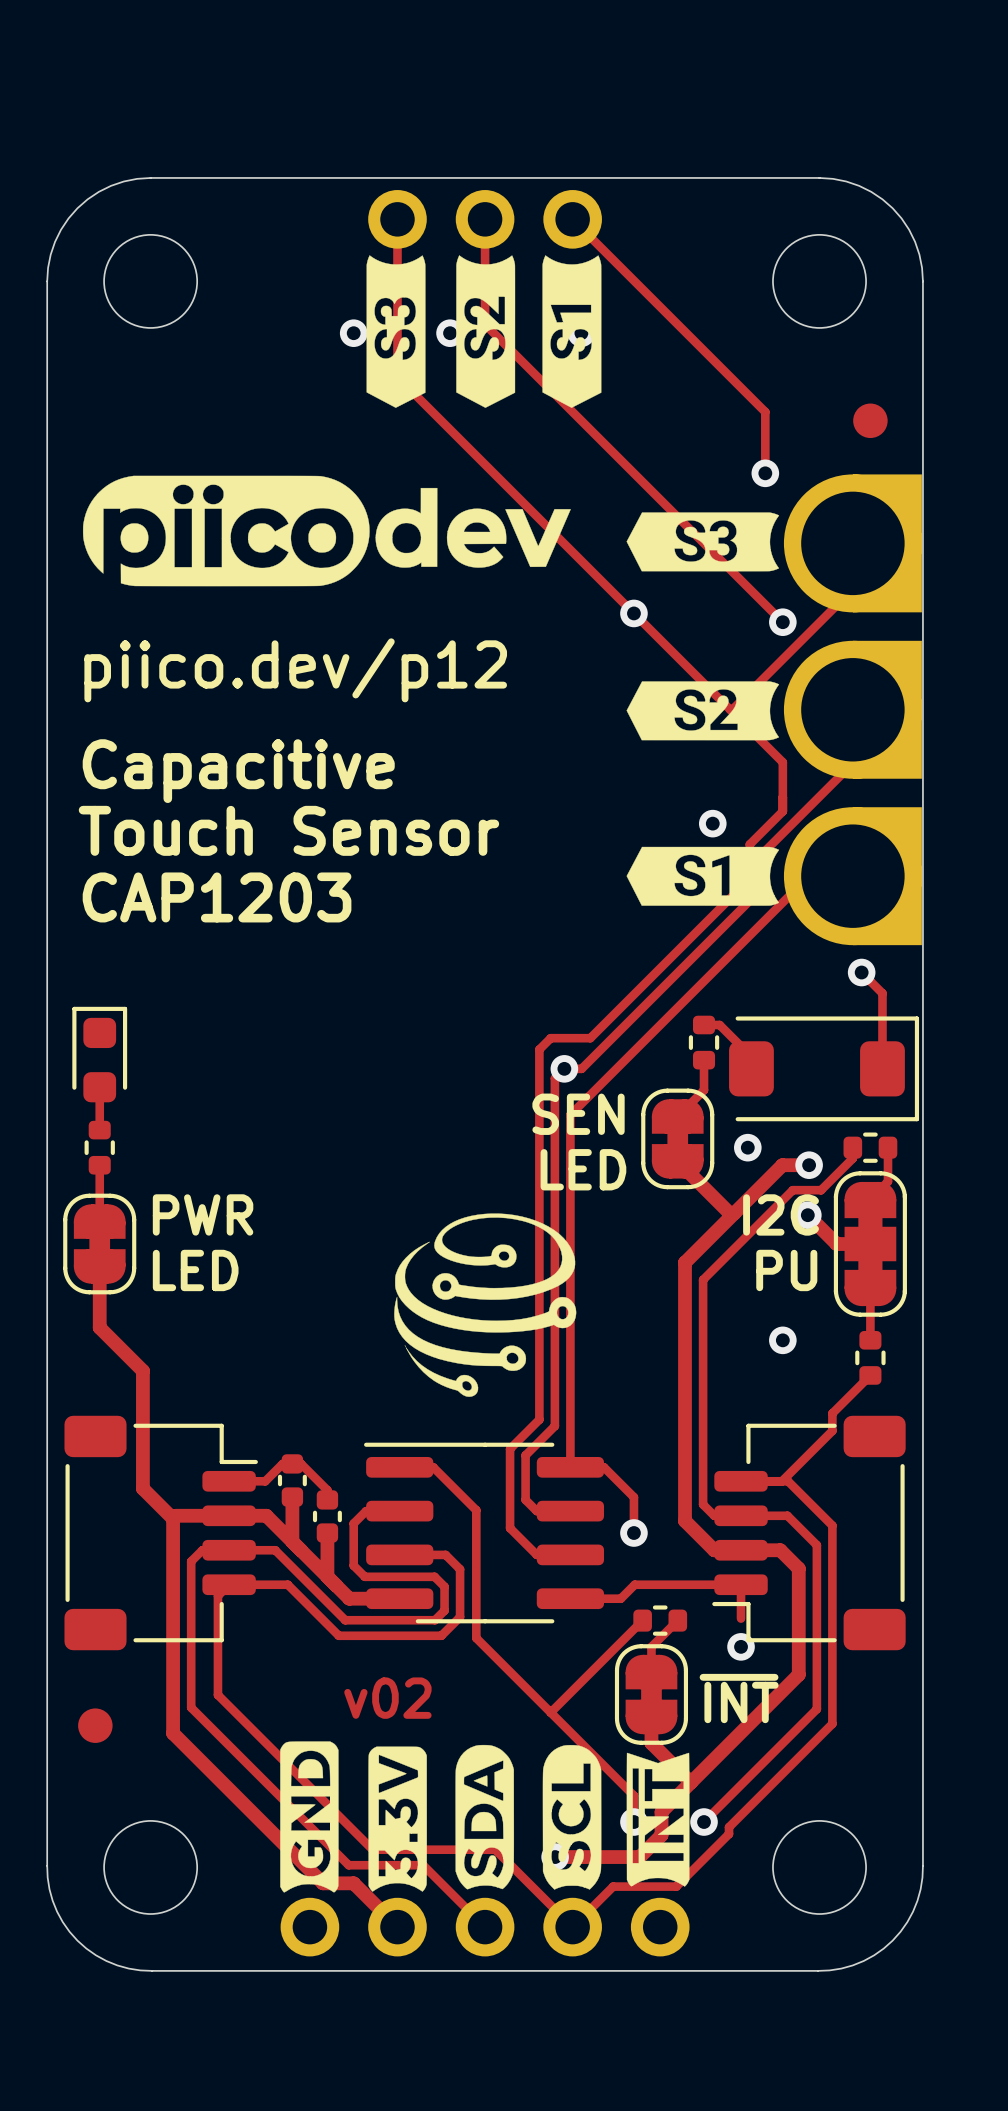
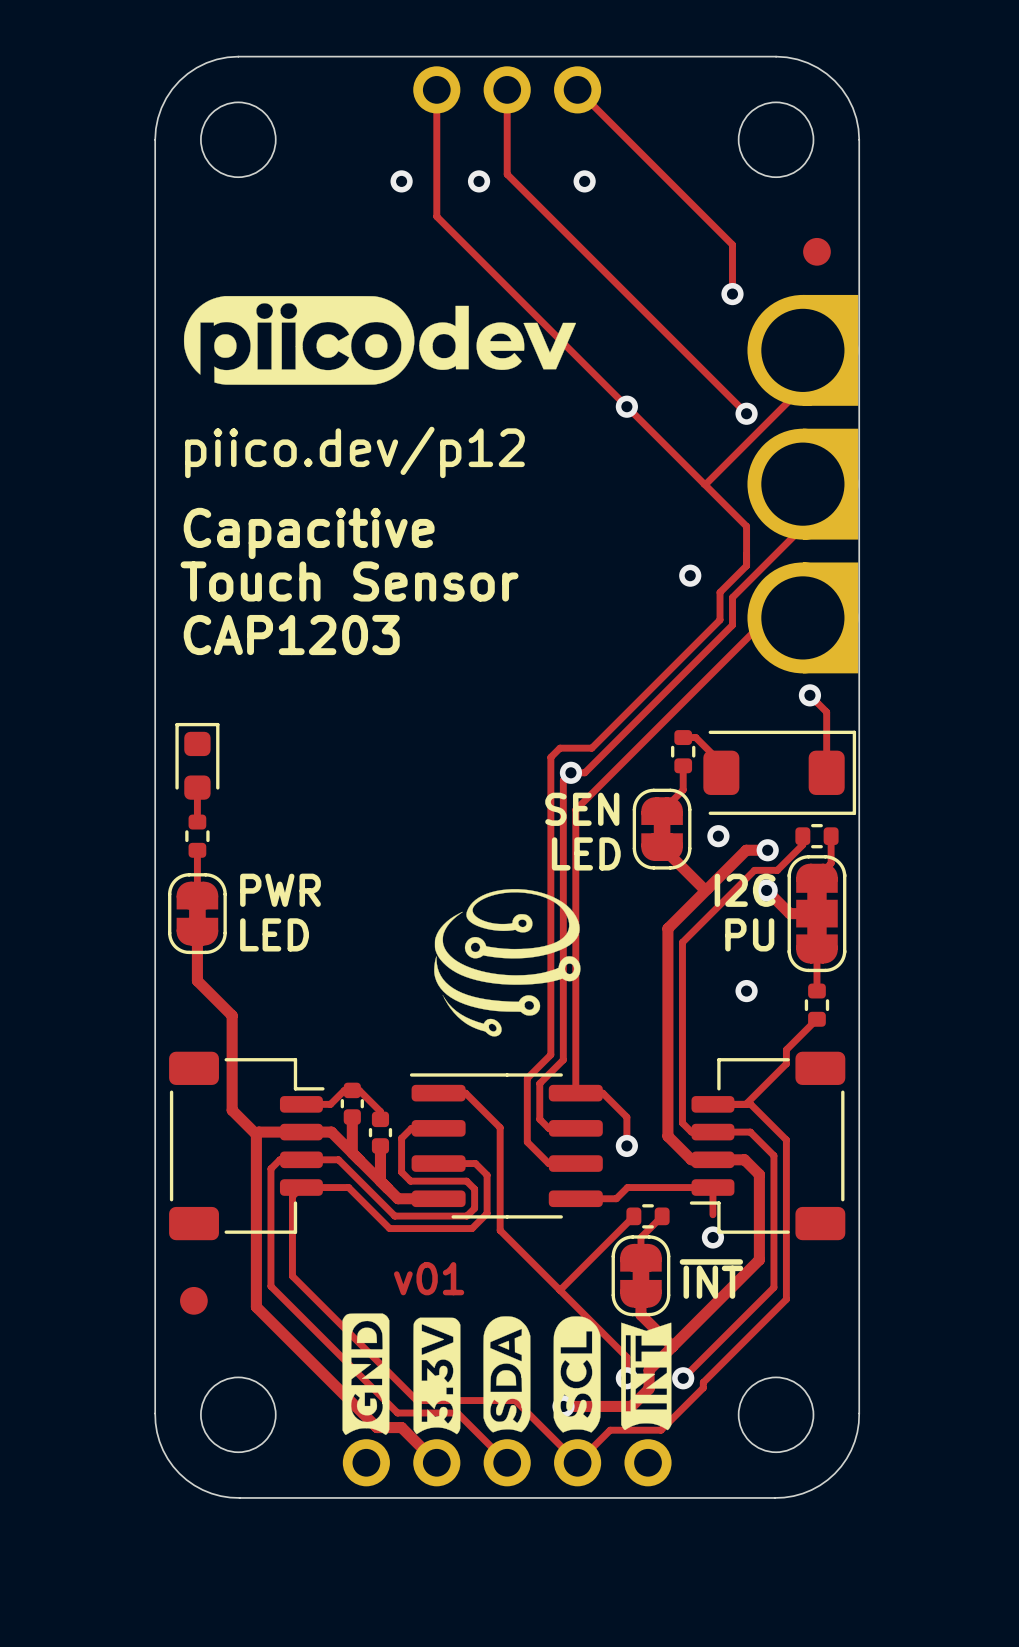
drawing: [366, 255, 602, 408] -> none
drawing: [626, 512, 780, 572] -> none
drawing: [626, 681, 780, 741] -> none
drawing: [626, 846, 780, 906] -> none
text: v02 (387, 1698) -> v01 (429, 1278)

